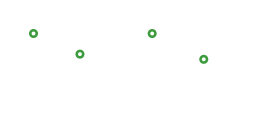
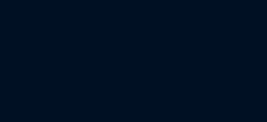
via: (33, 33) -> none
via: (152, 33) -> none
via: (79, 54) -> none
via: (203, 59) -> none

